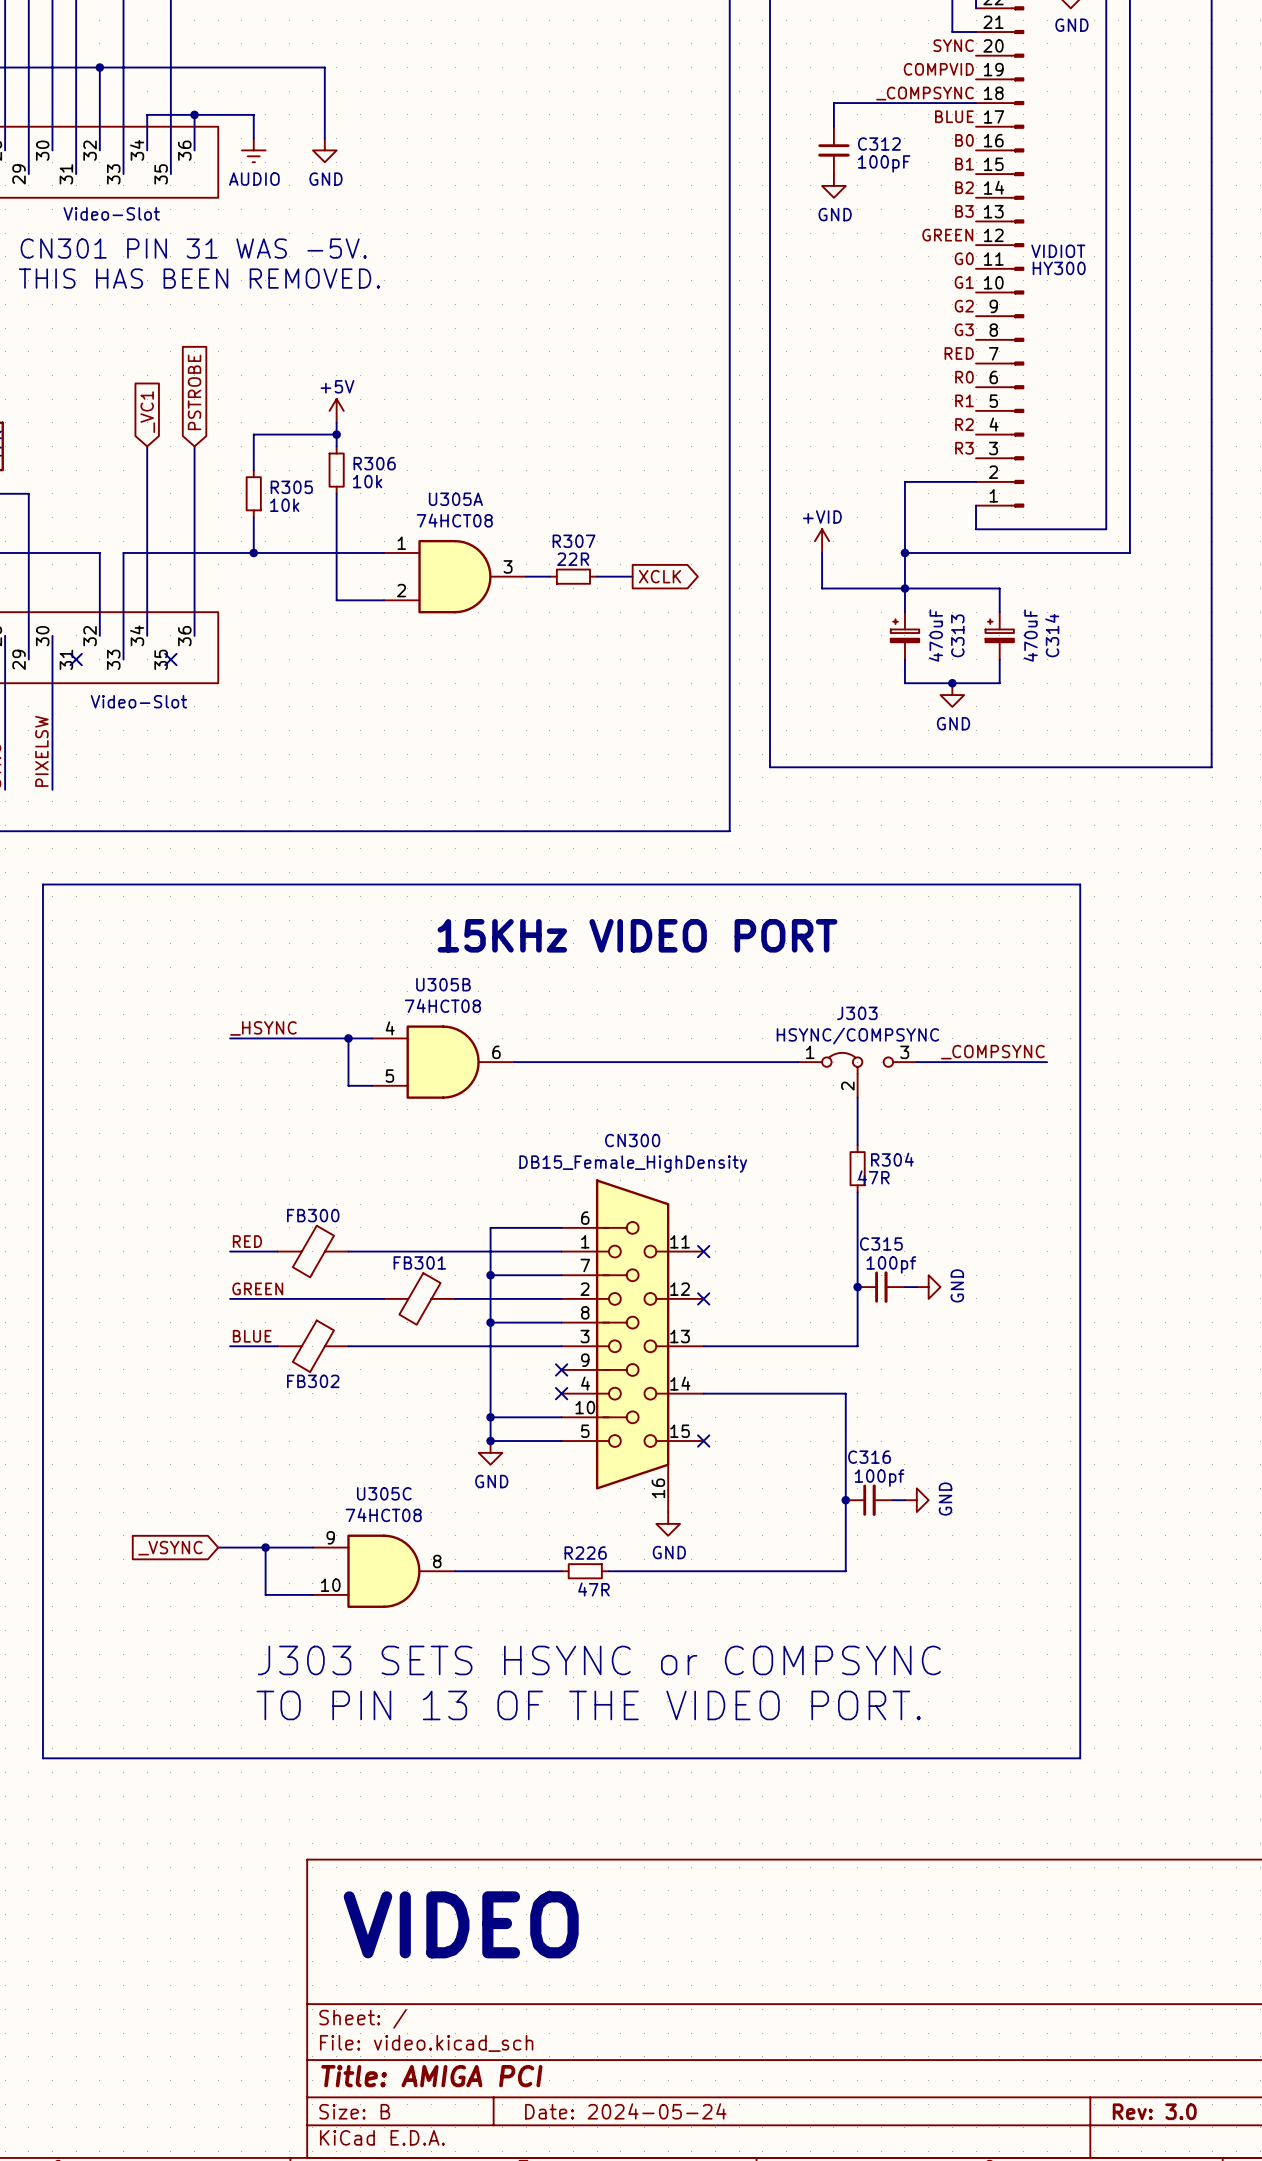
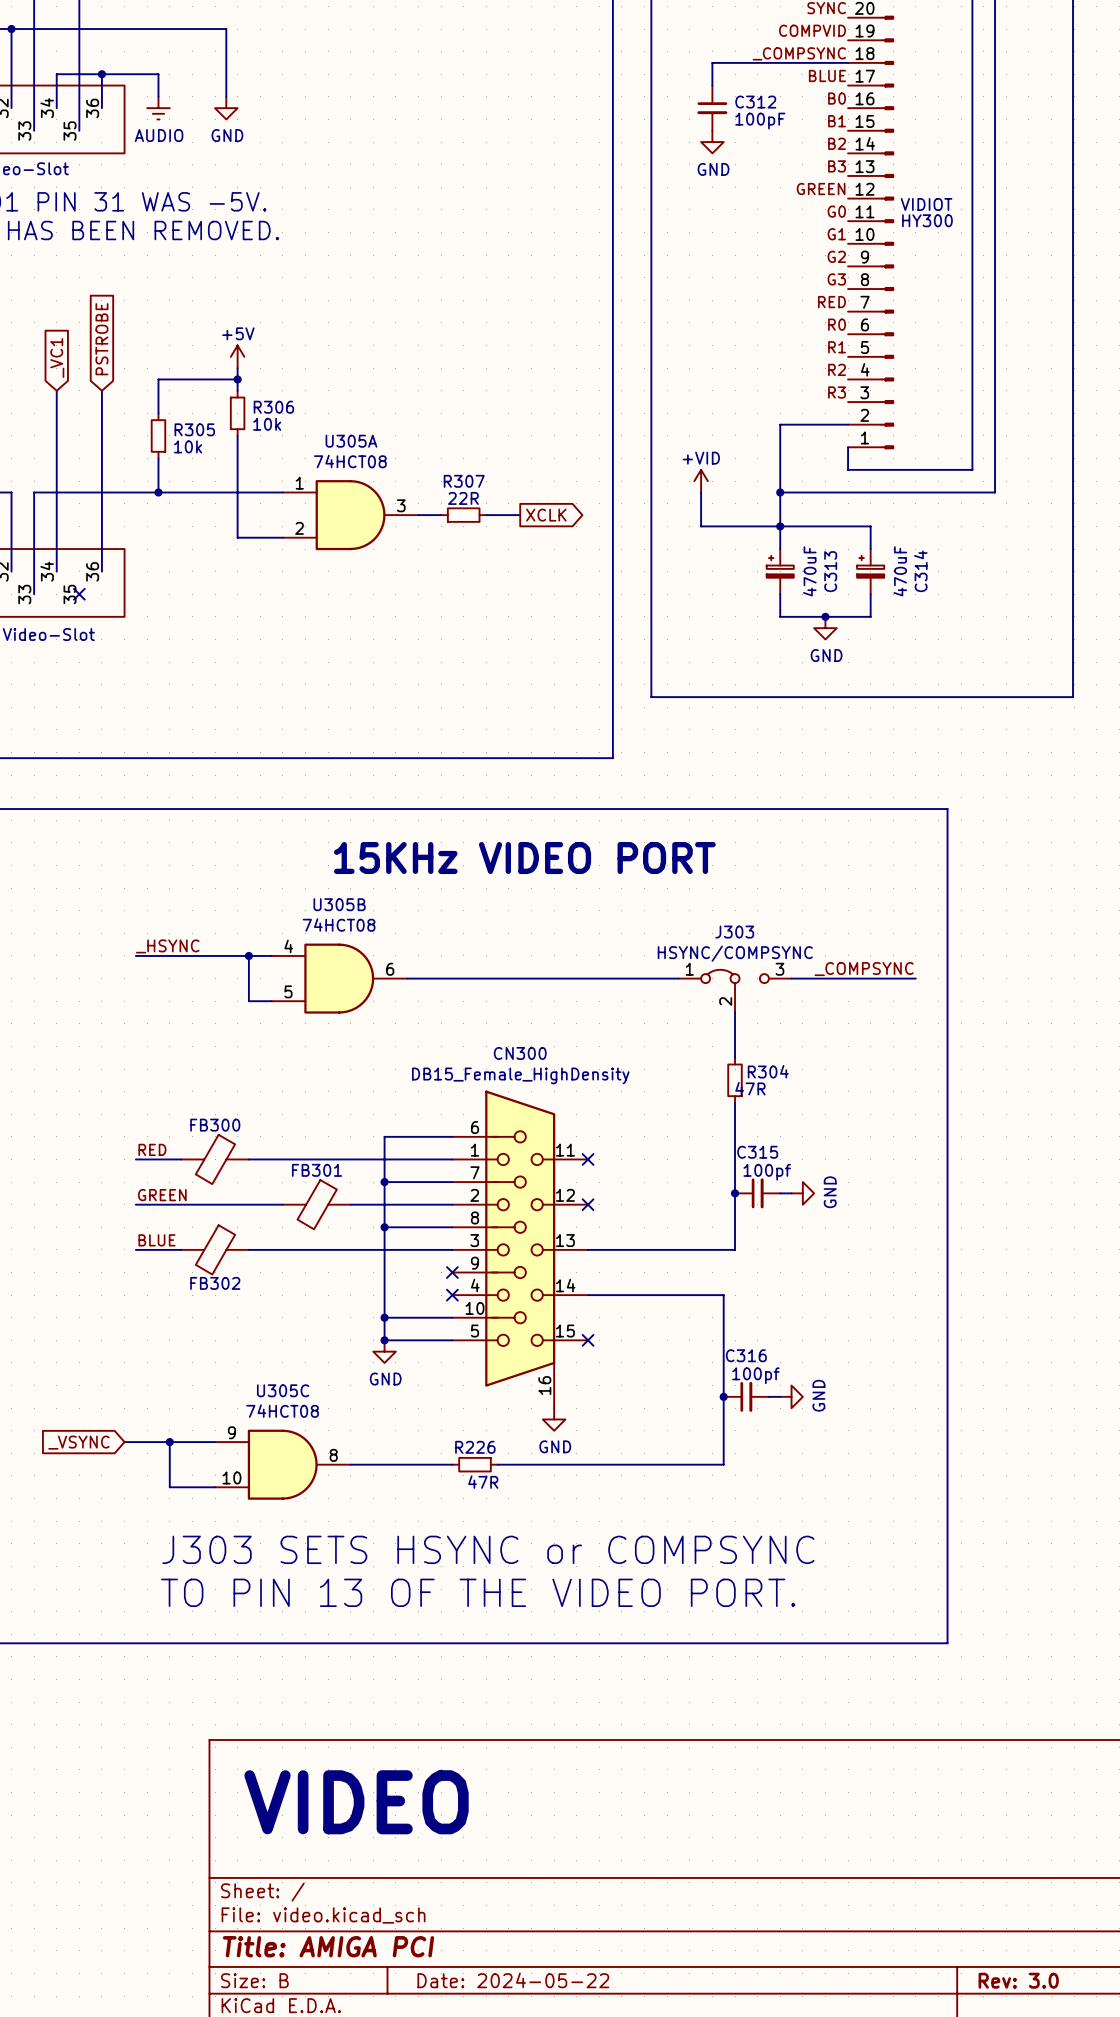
title block: Date: 2024-05-24 (625, 2111) -> Date: 2024-05-22 (513, 1980)

